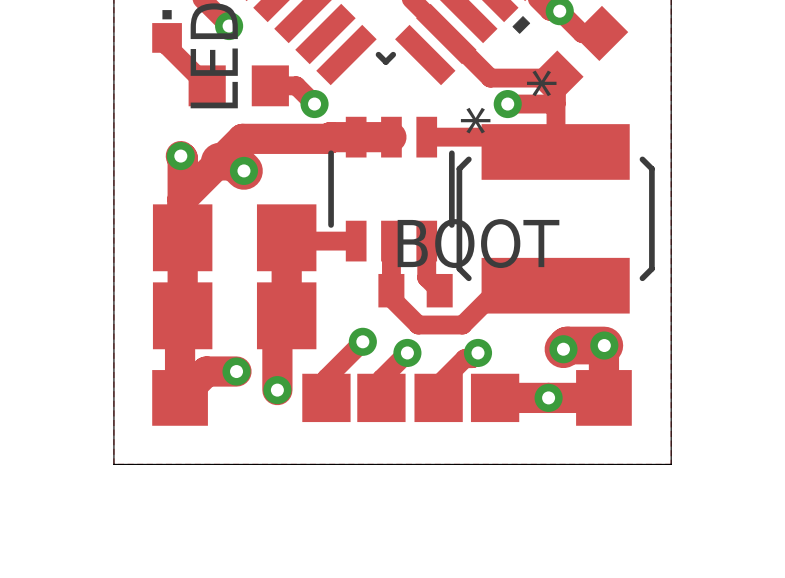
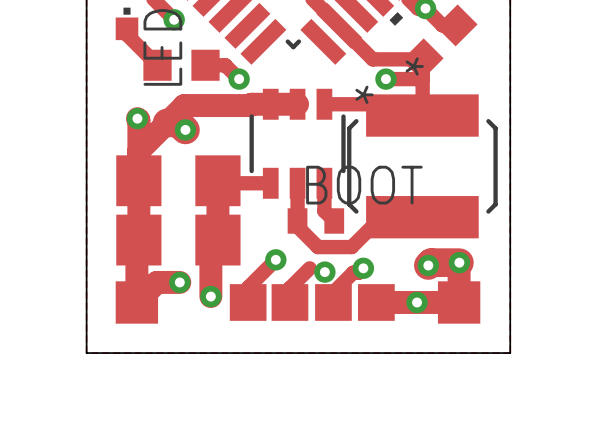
via position: (407, 352) -> (324, 272)

